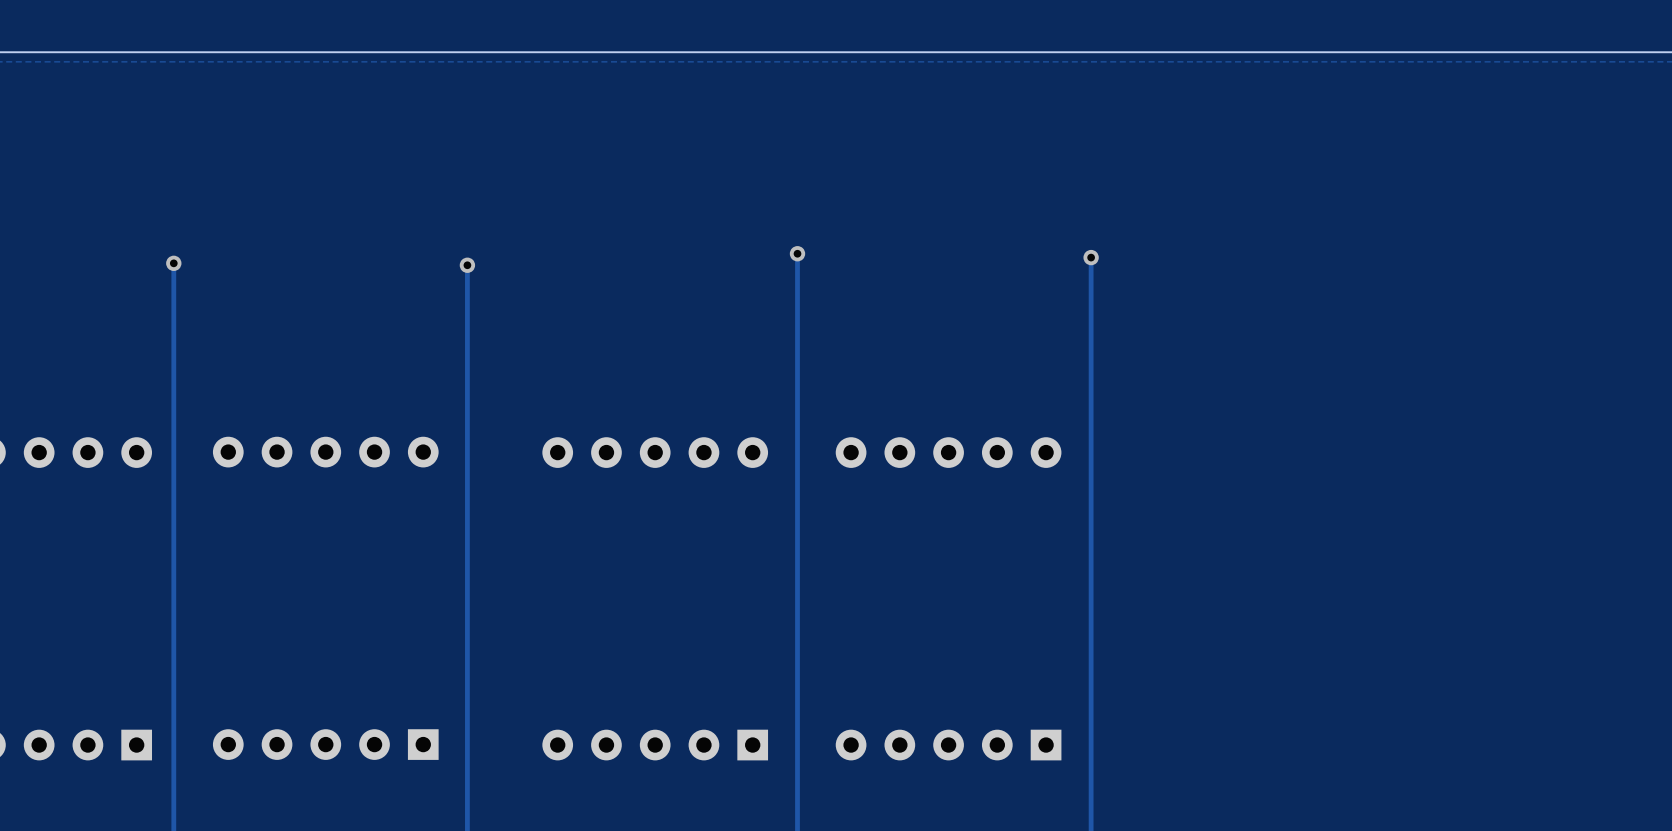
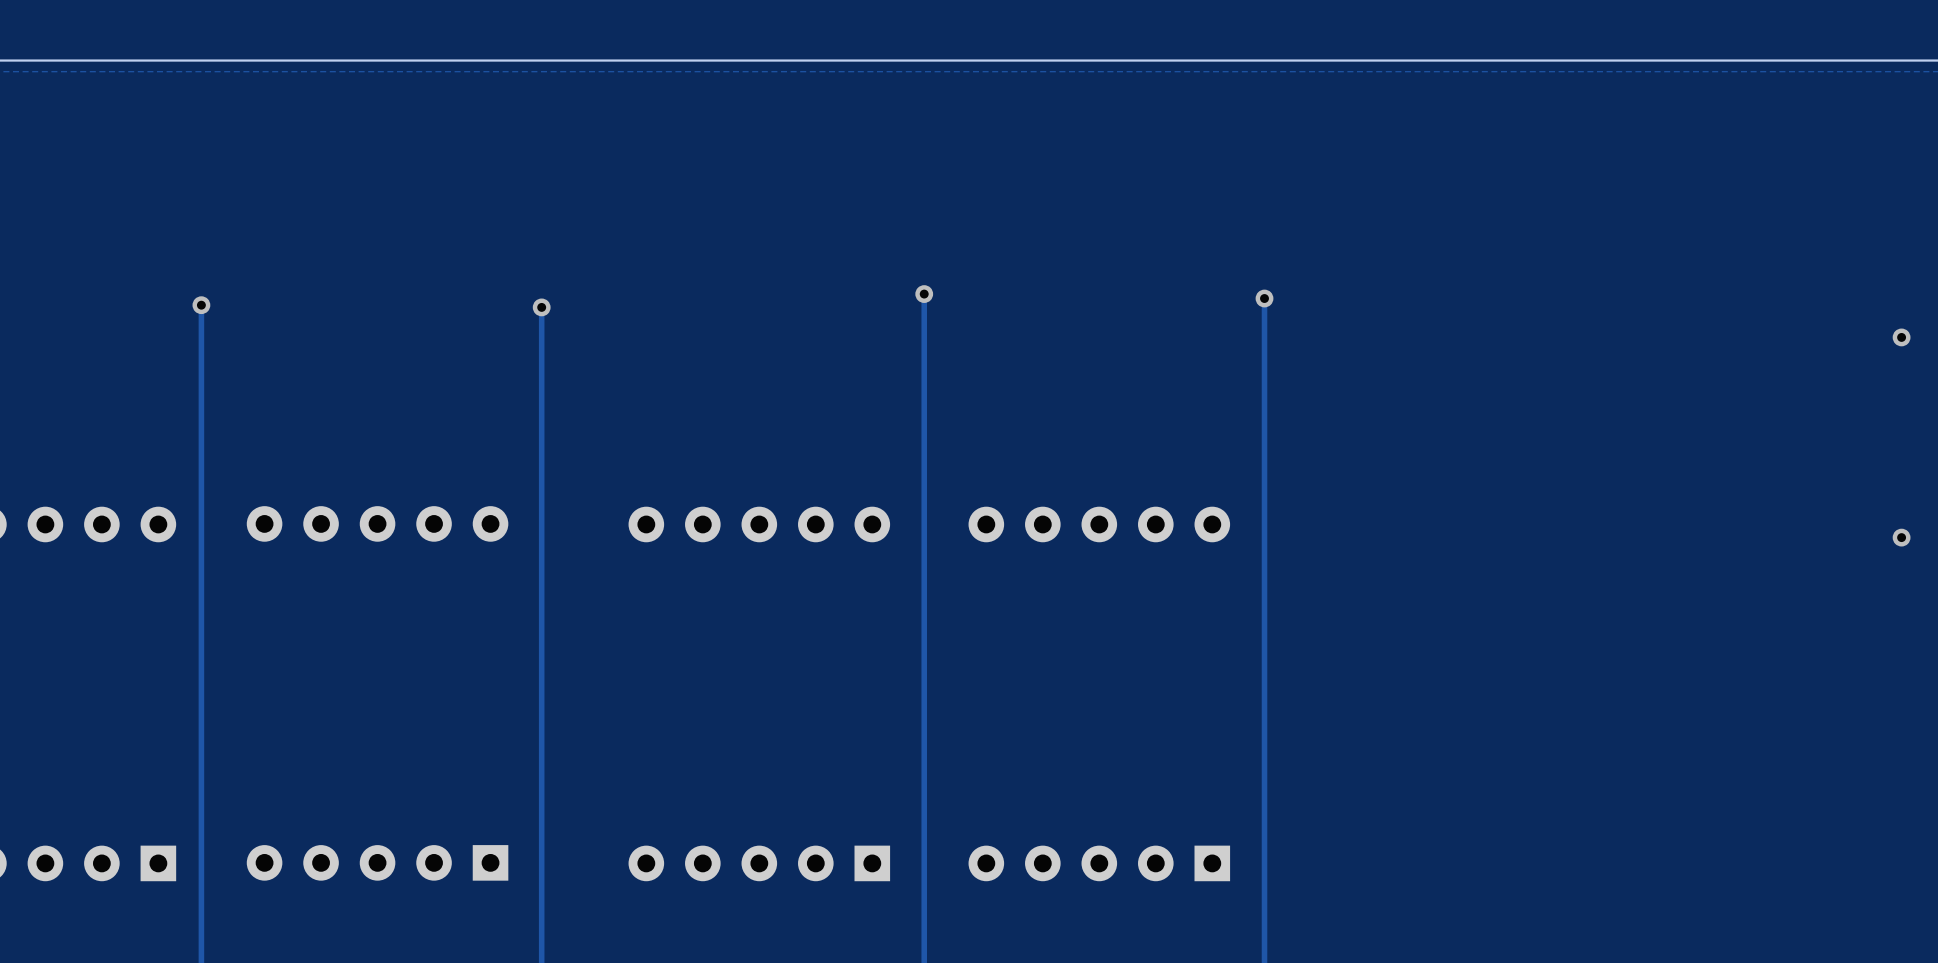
via: none -> (1901, 337)
via: none -> (1901, 537)

